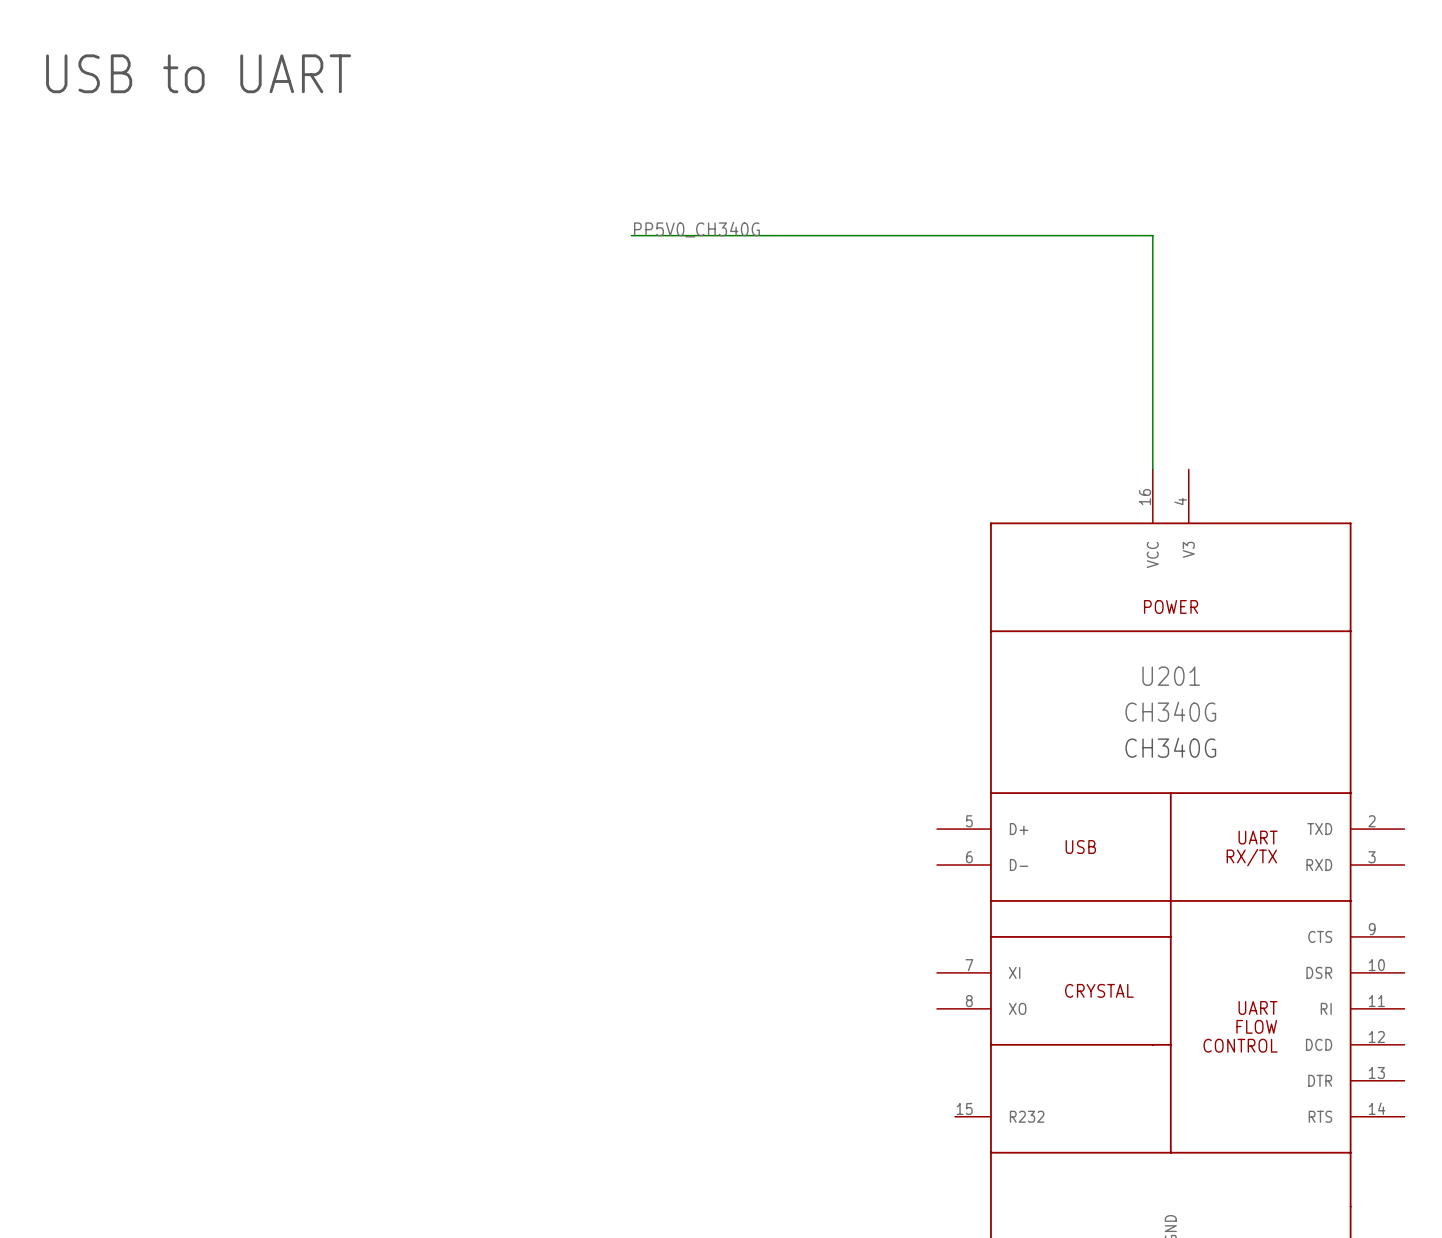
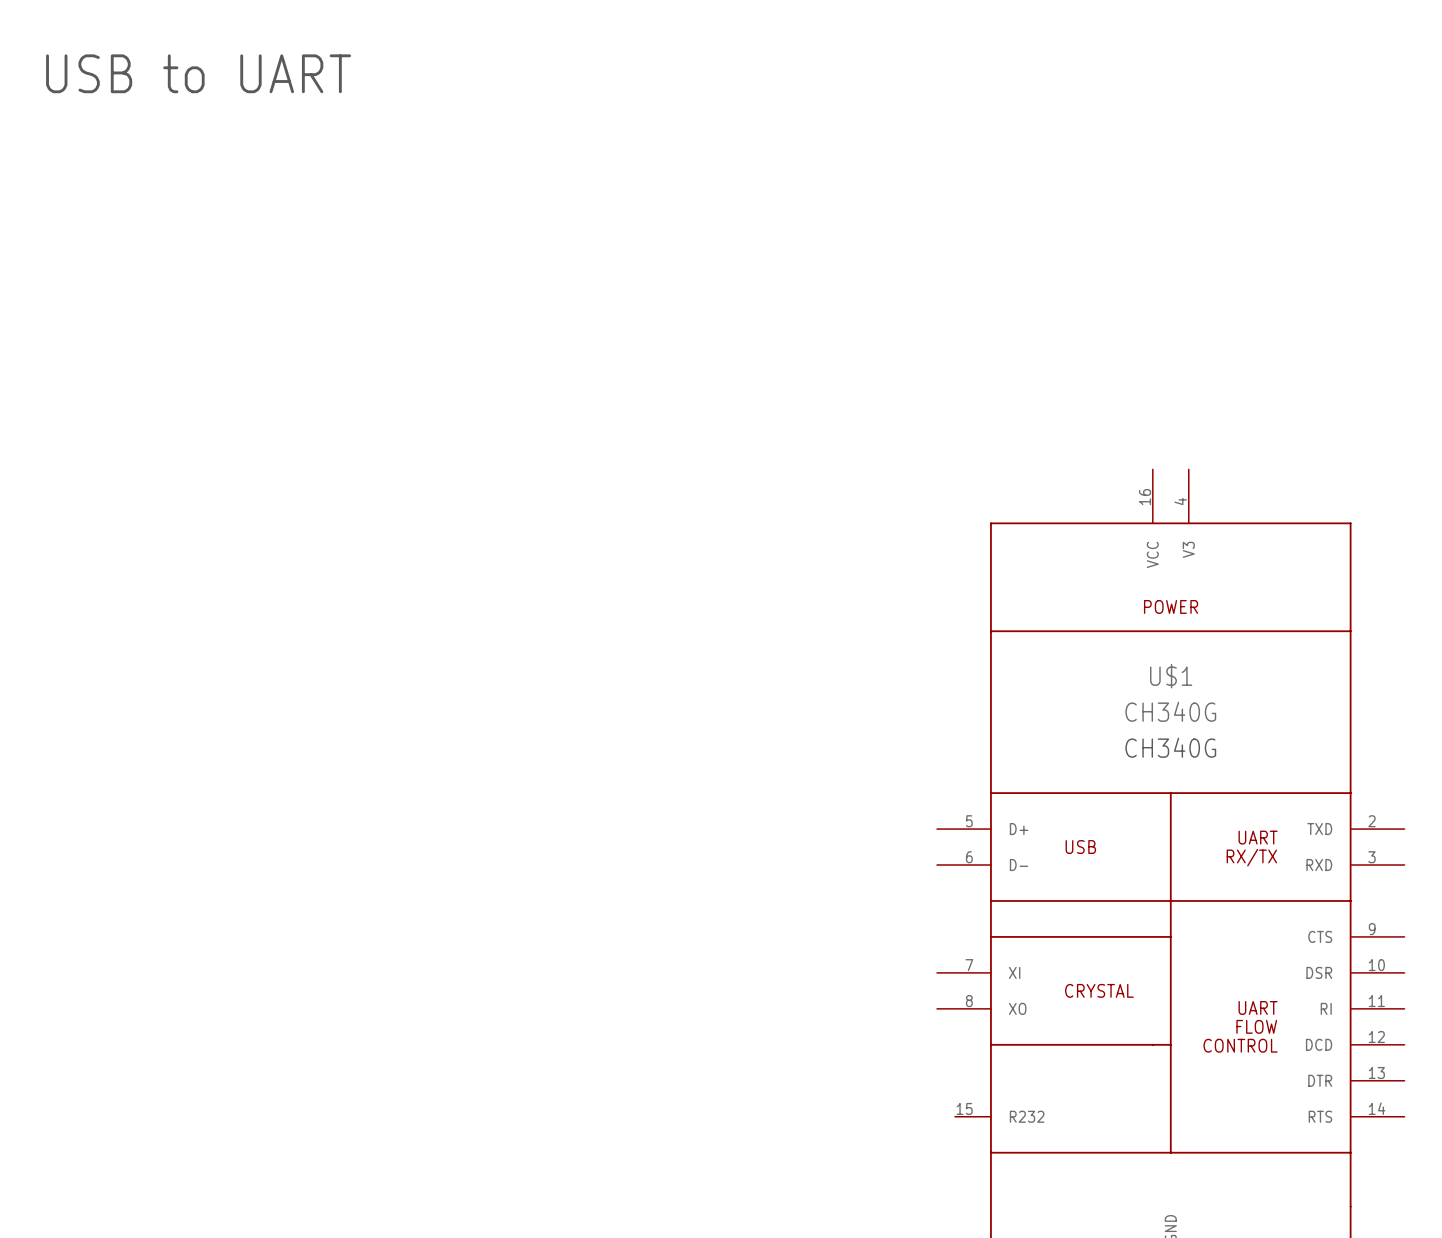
label: PP5V0_CH340G (696, 229) -> none
wire: (631, 235) (1152, 235) (1152, 469) -> none
U201 name: U201 (1171, 676) -> U$1 (1171, 676)

